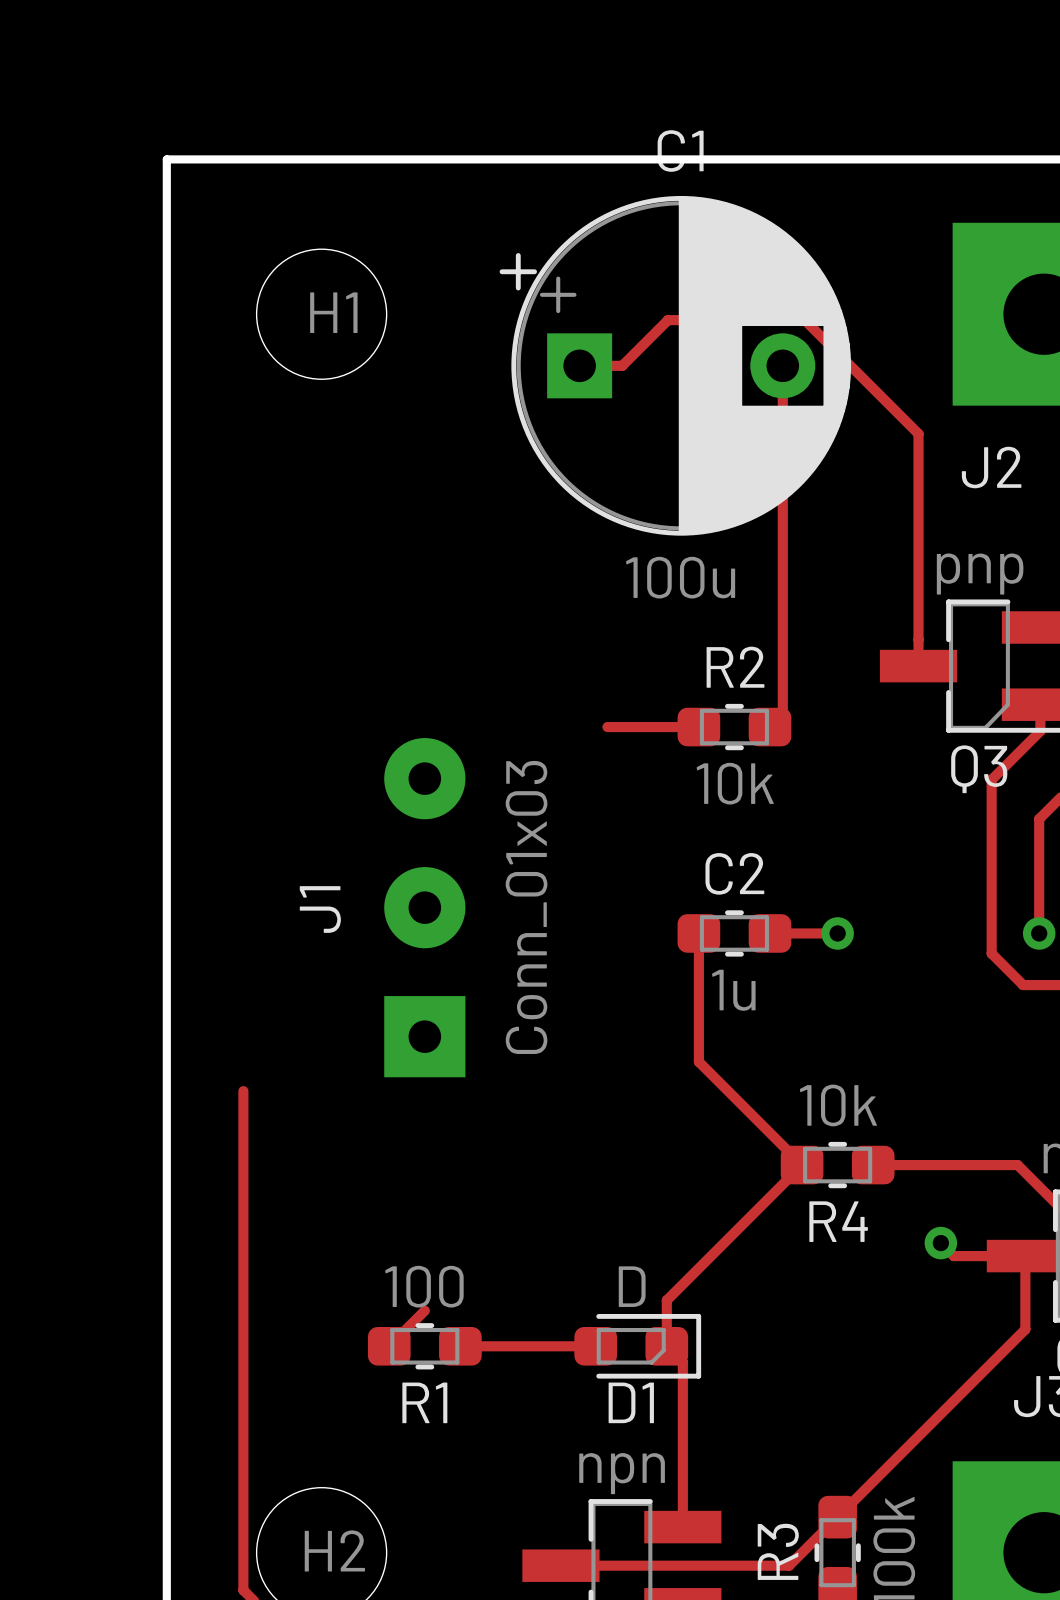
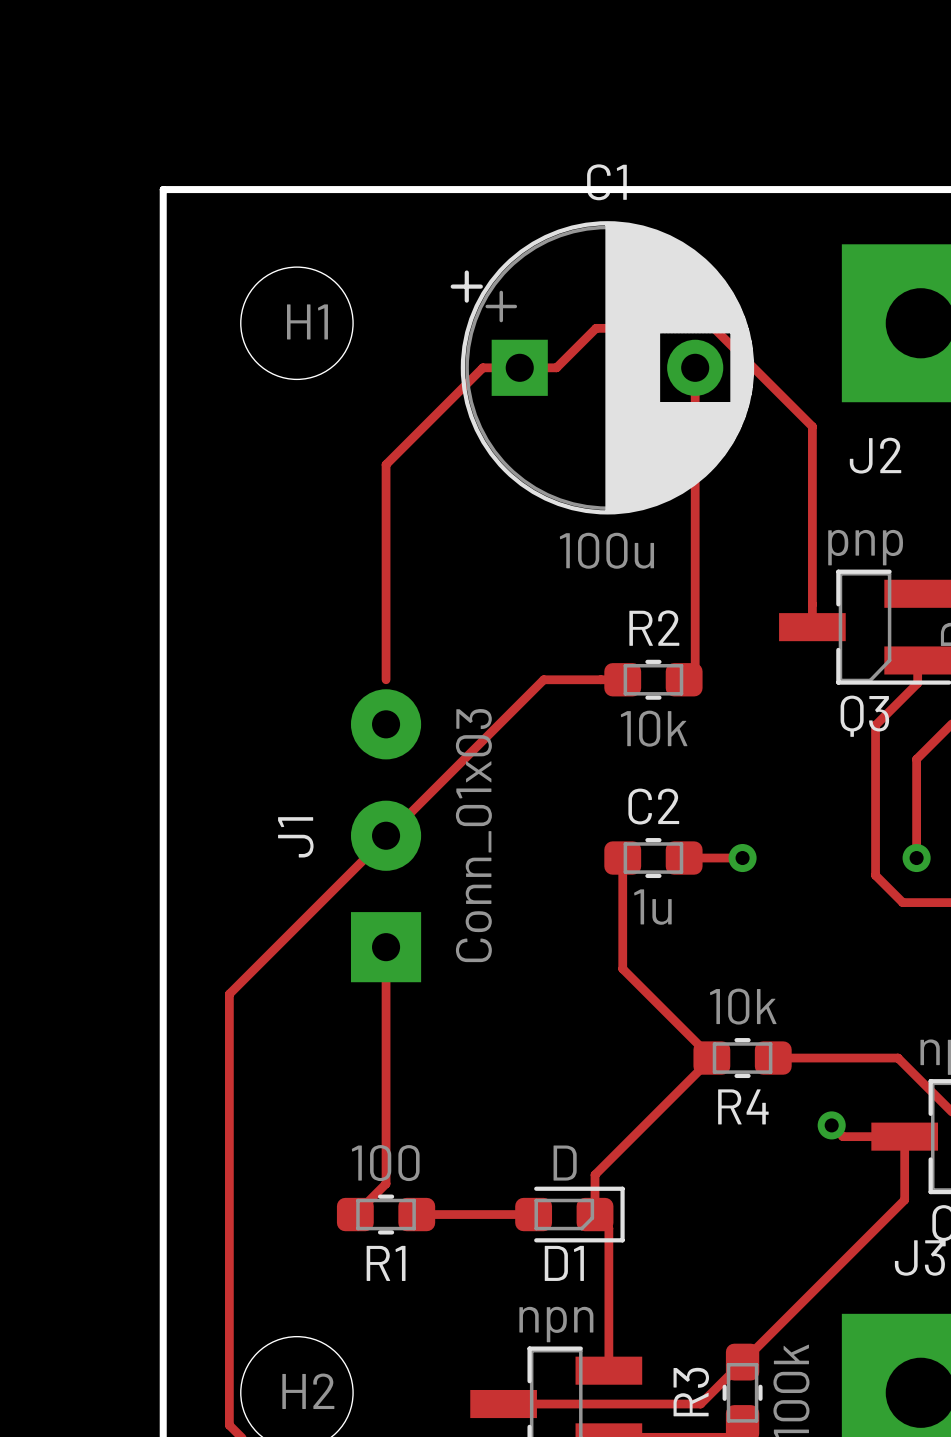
track: none -> (519, 367) (482, 367) (386, 464) (386, 679)
track: none -> (543, 679) (229, 994)
track: none -> (386, 947) (386, 1183)

